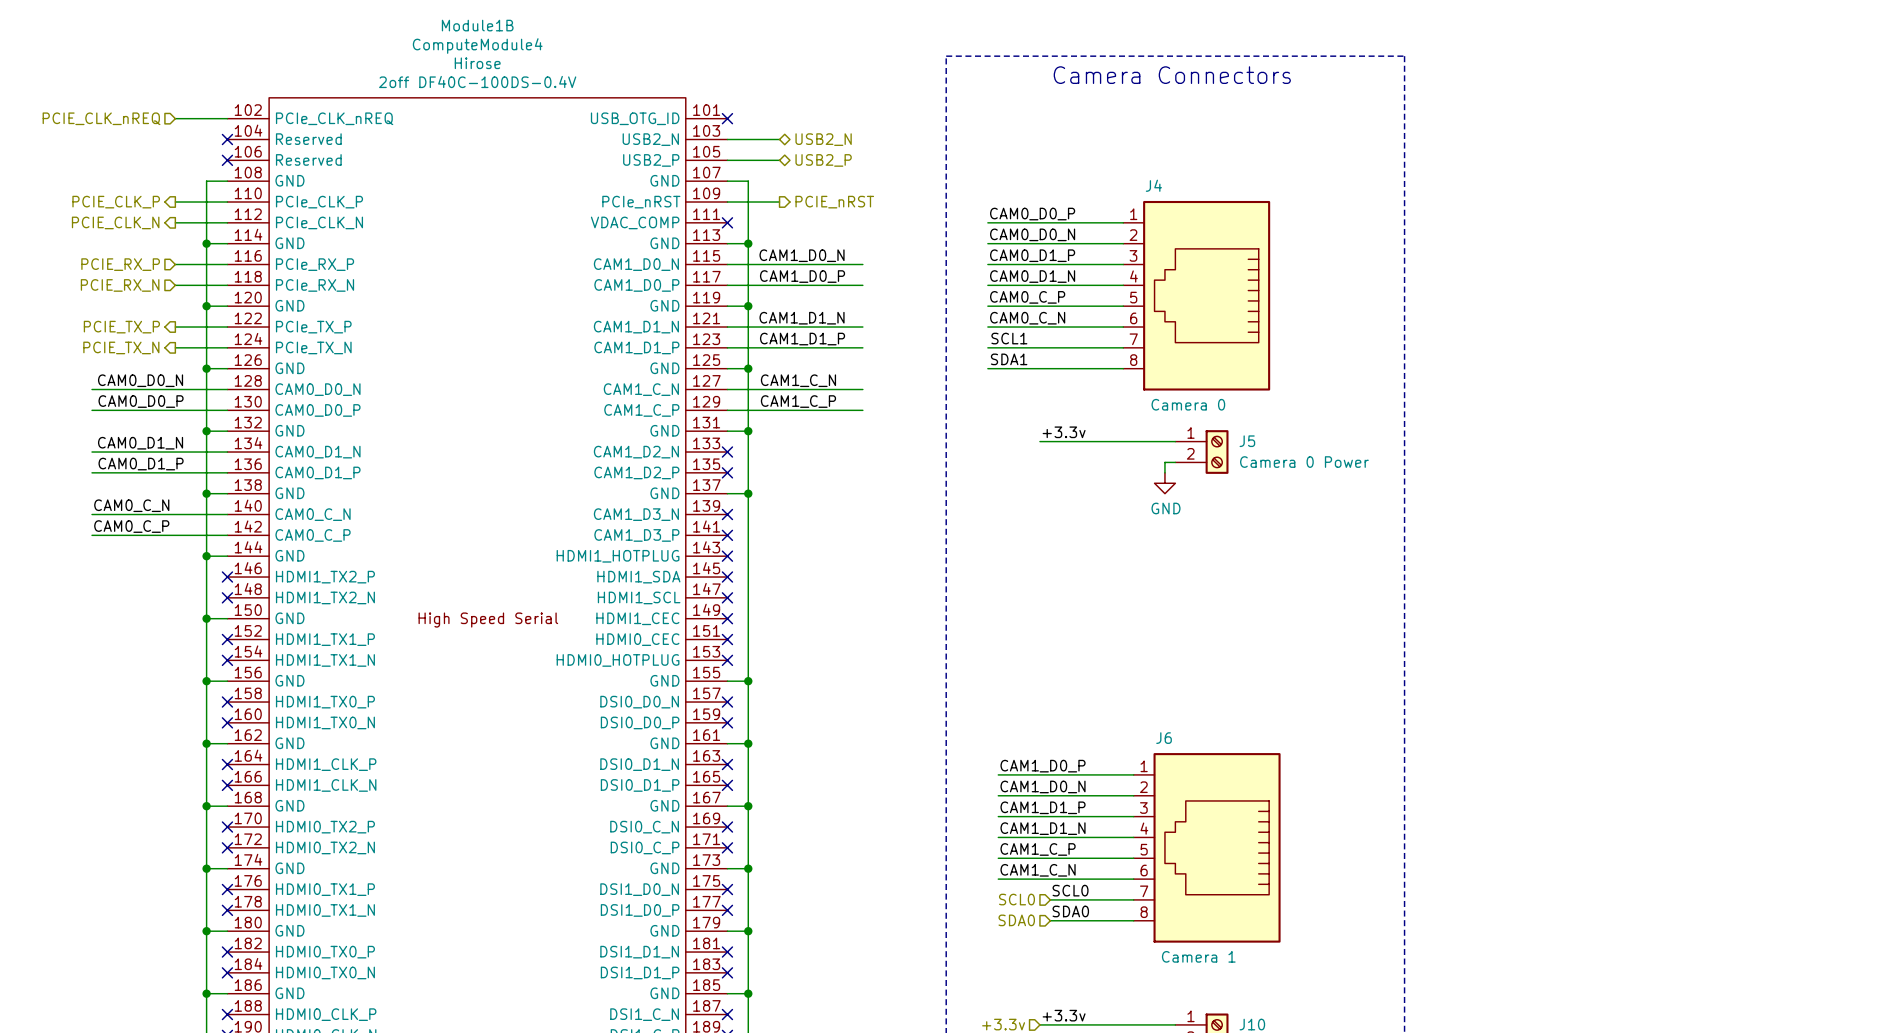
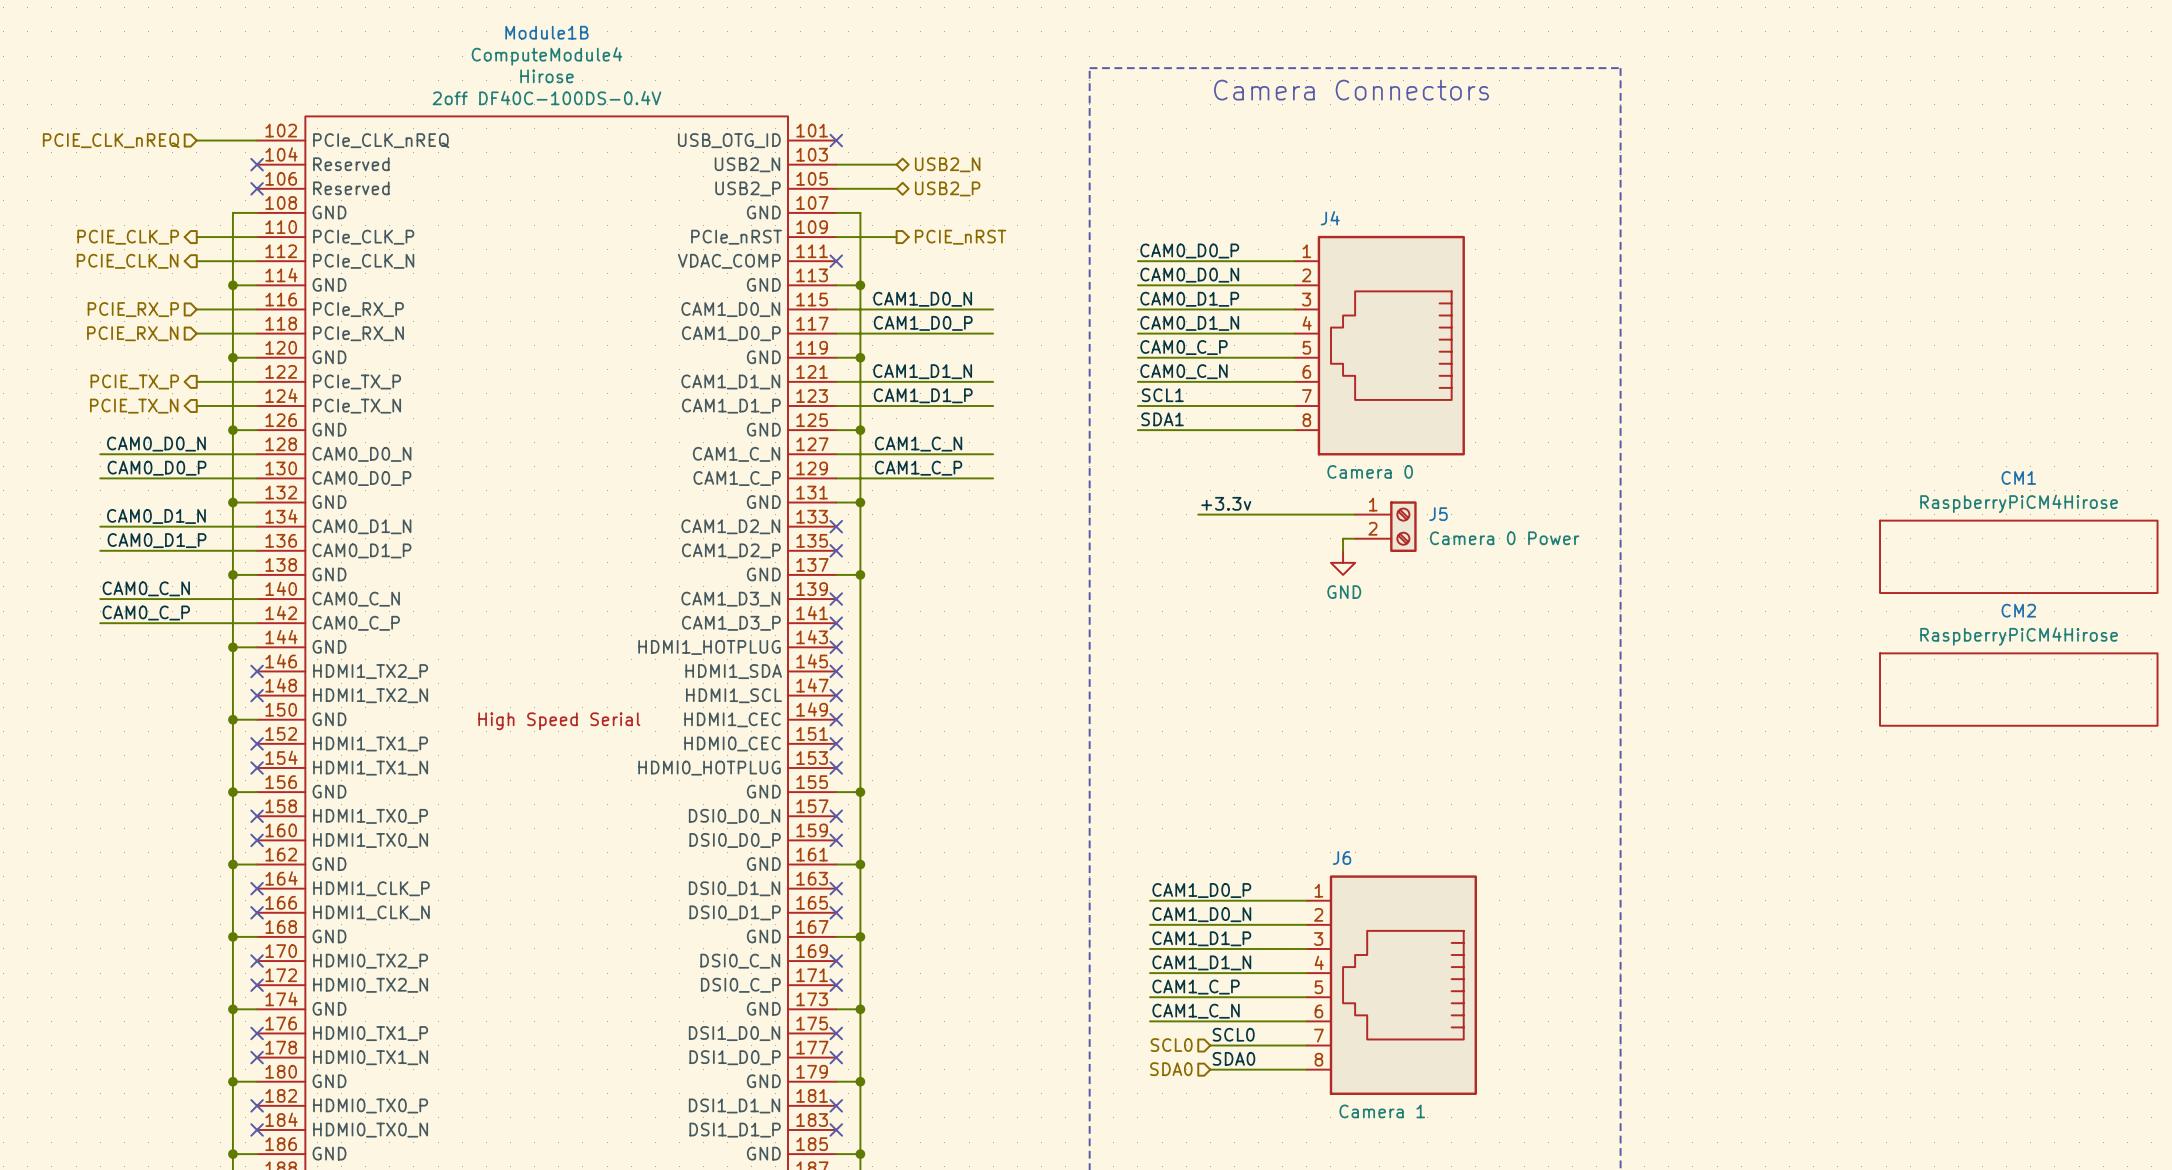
CM1: none -> RaspberryPiCM4Hirose (2018, 556)
CM2: none -> RaspberryPiCM4Hirose (2018, 689)

